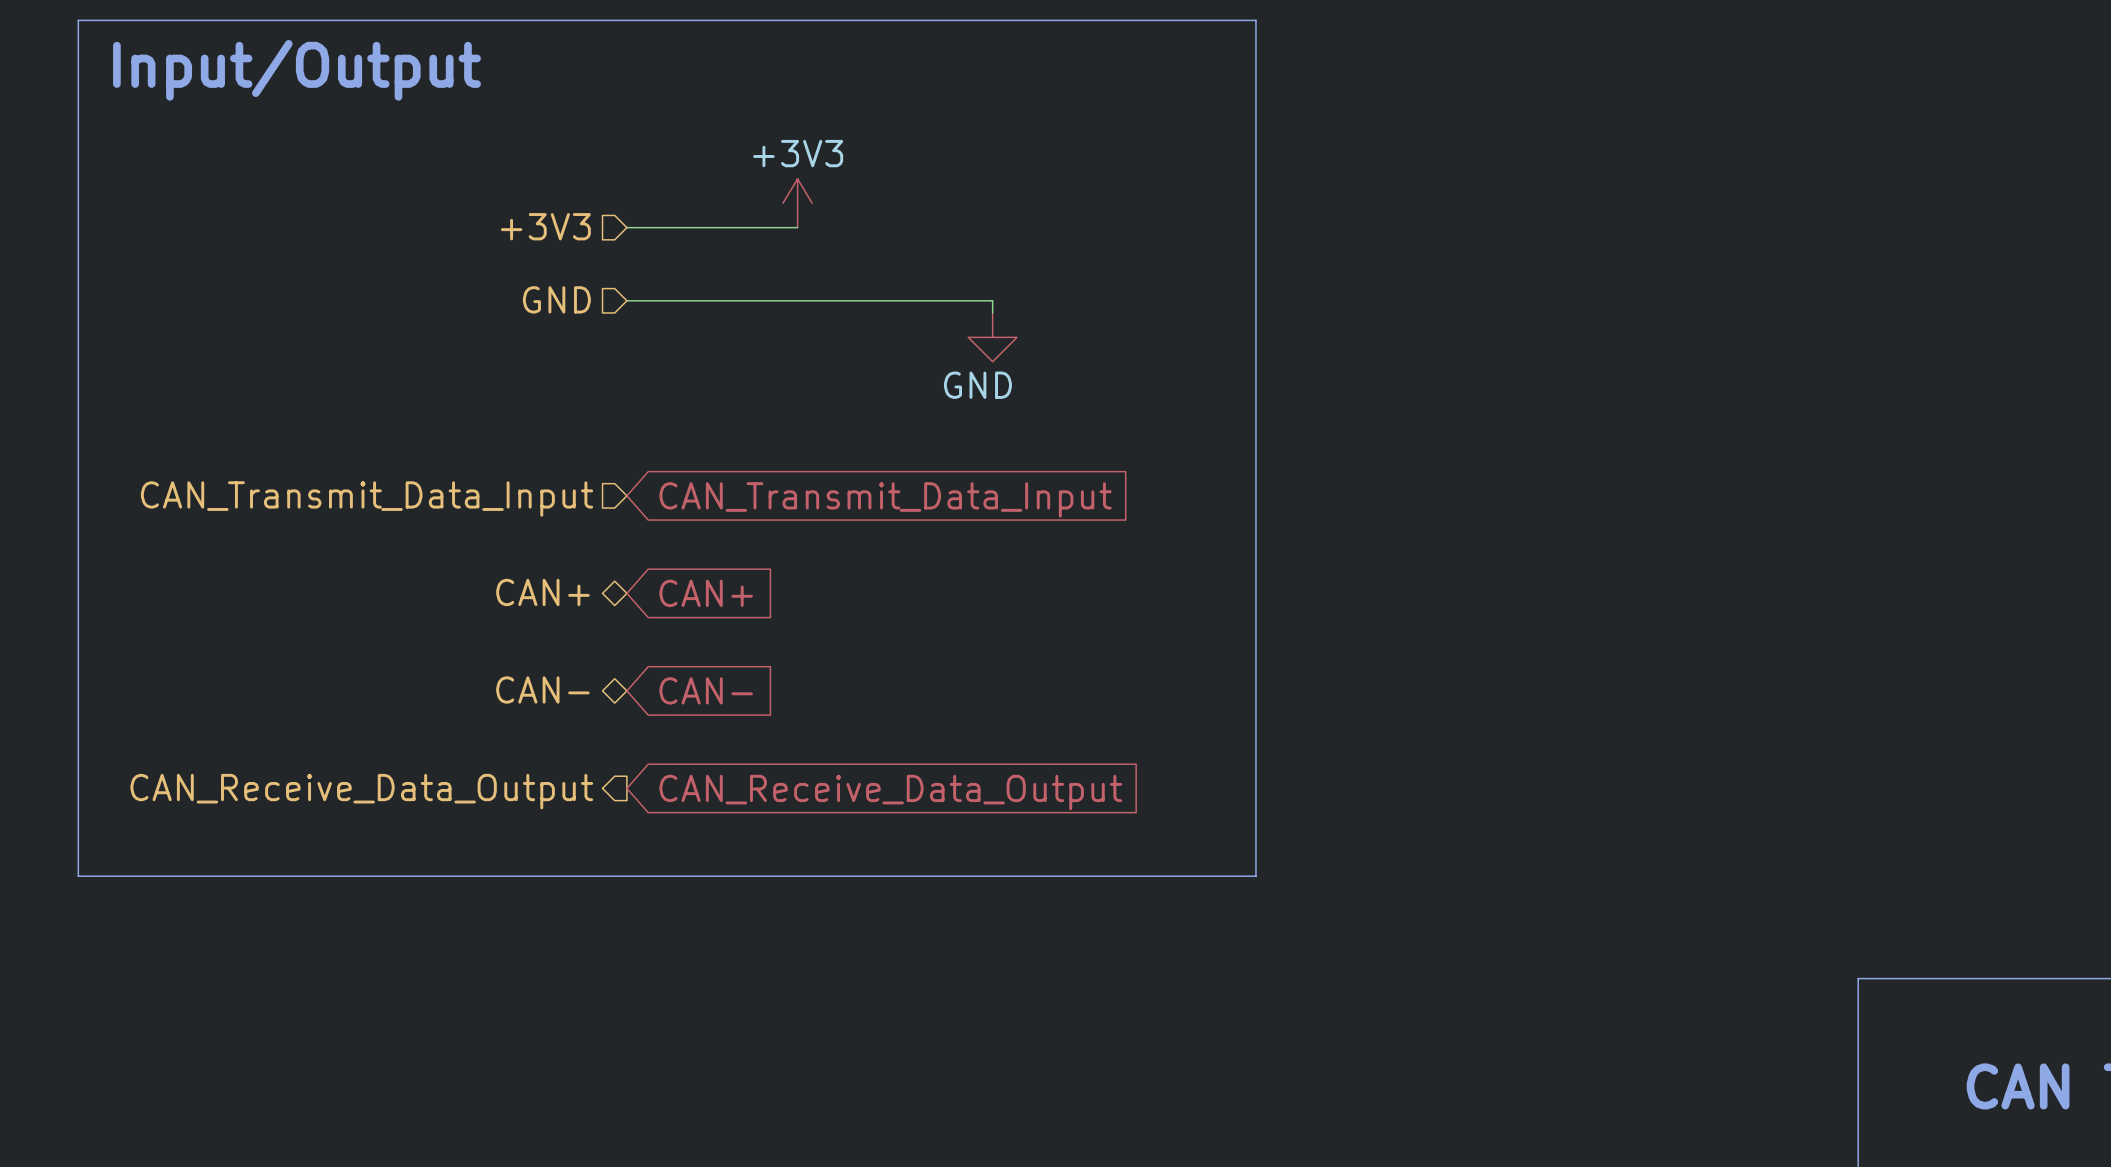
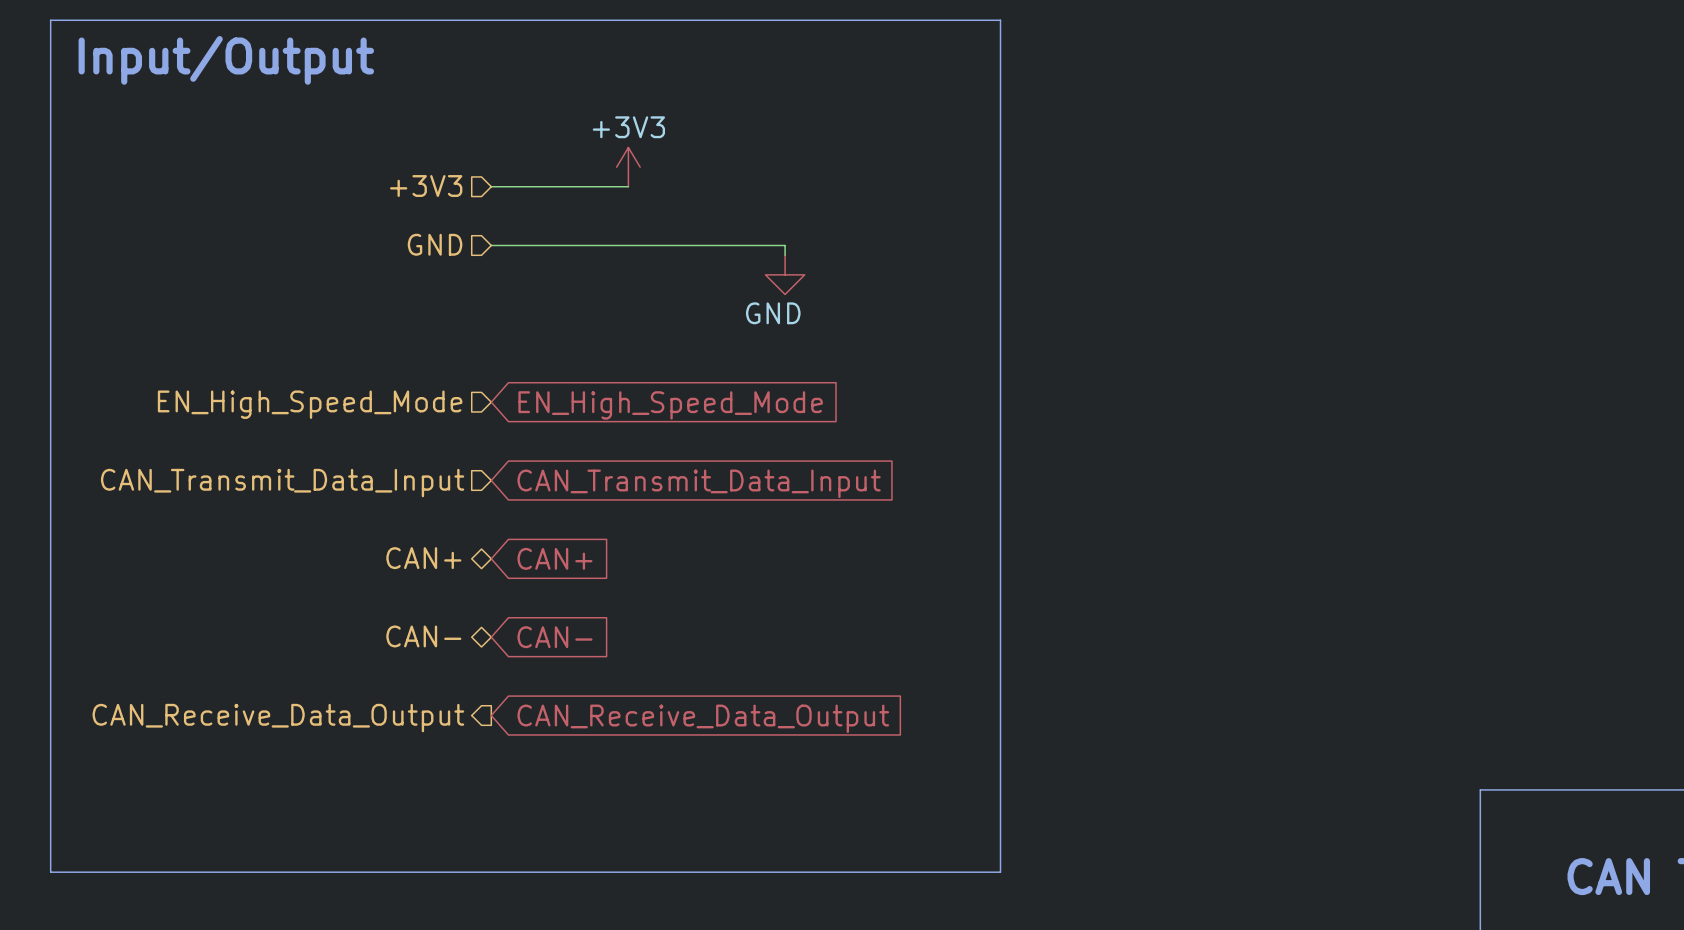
line: (1255, 20) (1255, 876) (78, 876) -> (996, 20) (1000, 20) (1000, 872) (50, 872) (50, 707)
hierarchical label: CAN_Transmit_Data_Input (367, 498) -> EN_High_Speed_Mode (310, 404)
global label: CAN_Transmit_Data_Input (885, 499) -> EN_High_Speed_Mode (670, 405)
hierarchical label shape: bidirectional (542, 592) -> input (282, 483)
hierarchical label: CAN+ (542, 592) -> CAN_Transmit_Data_Input (282, 483)
global label: CAN+ (706, 593) -> CAN_Transmit_Data_Input (699, 483)
hierarchical label: CAN- (542, 689) -> CAN+ (423, 558)
global label: CAN- (706, 690) -> CAN+ (554, 558)
hierarchical label shape: output (361, 791) -> bidirectional (423, 636)
hierarchical label: CAN_Receive_Data_Output (361, 791) -> CAN- (423, 636)
global label: CAN_Receive_Data_Output (890, 792) -> CAN- (554, 637)
hierarchical label: none -> CAN_Receive_Data_Output (278, 718)
global label: none -> CAN_Receive_Data_Output (703, 718)

